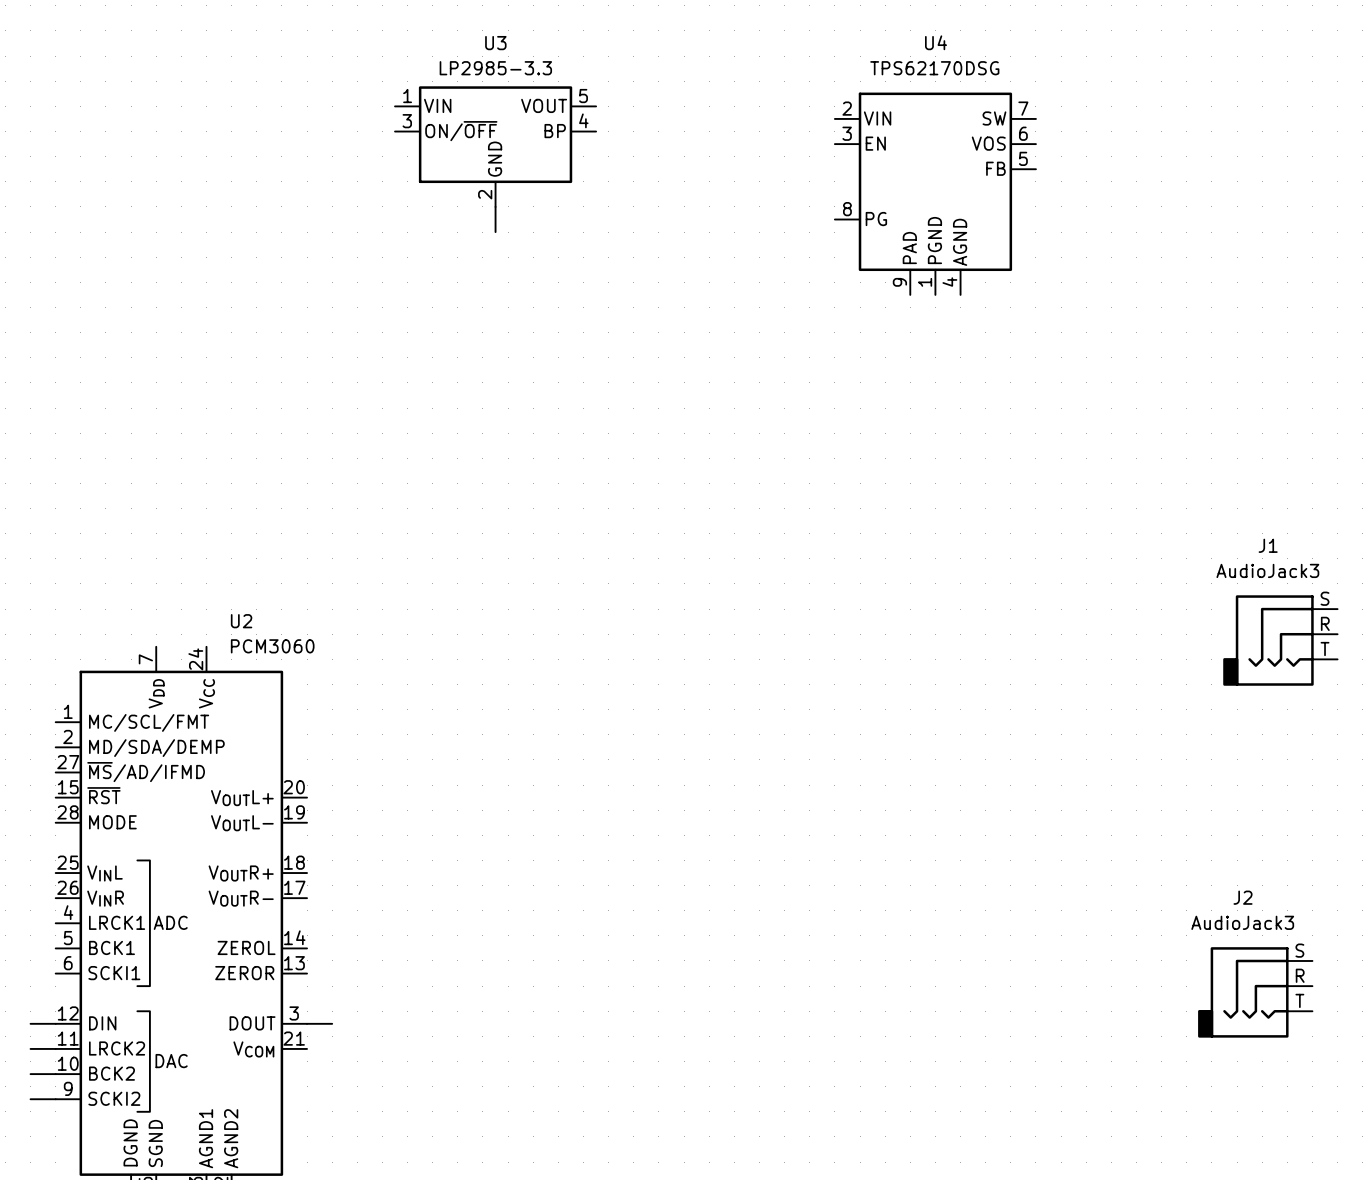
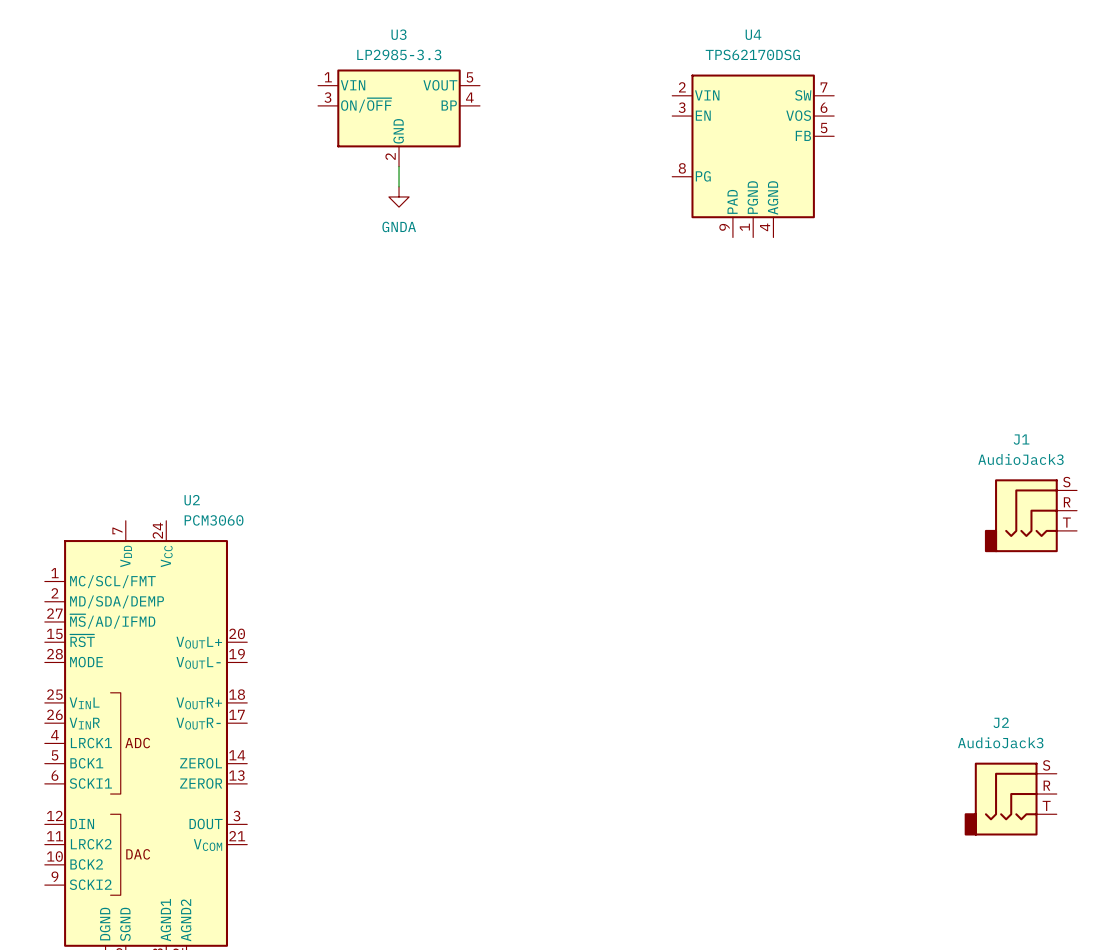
power symbol: none -> GNDA (399, 196)
wire: (30, 1023) (55, 1023) -> none
wire: (307, 1023) (332, 1023) -> none
wire: (30, 1048) (55, 1048) -> none
wire: (30, 1074) (55, 1074) -> none
wire: (30, 1099) (55, 1099) -> none

